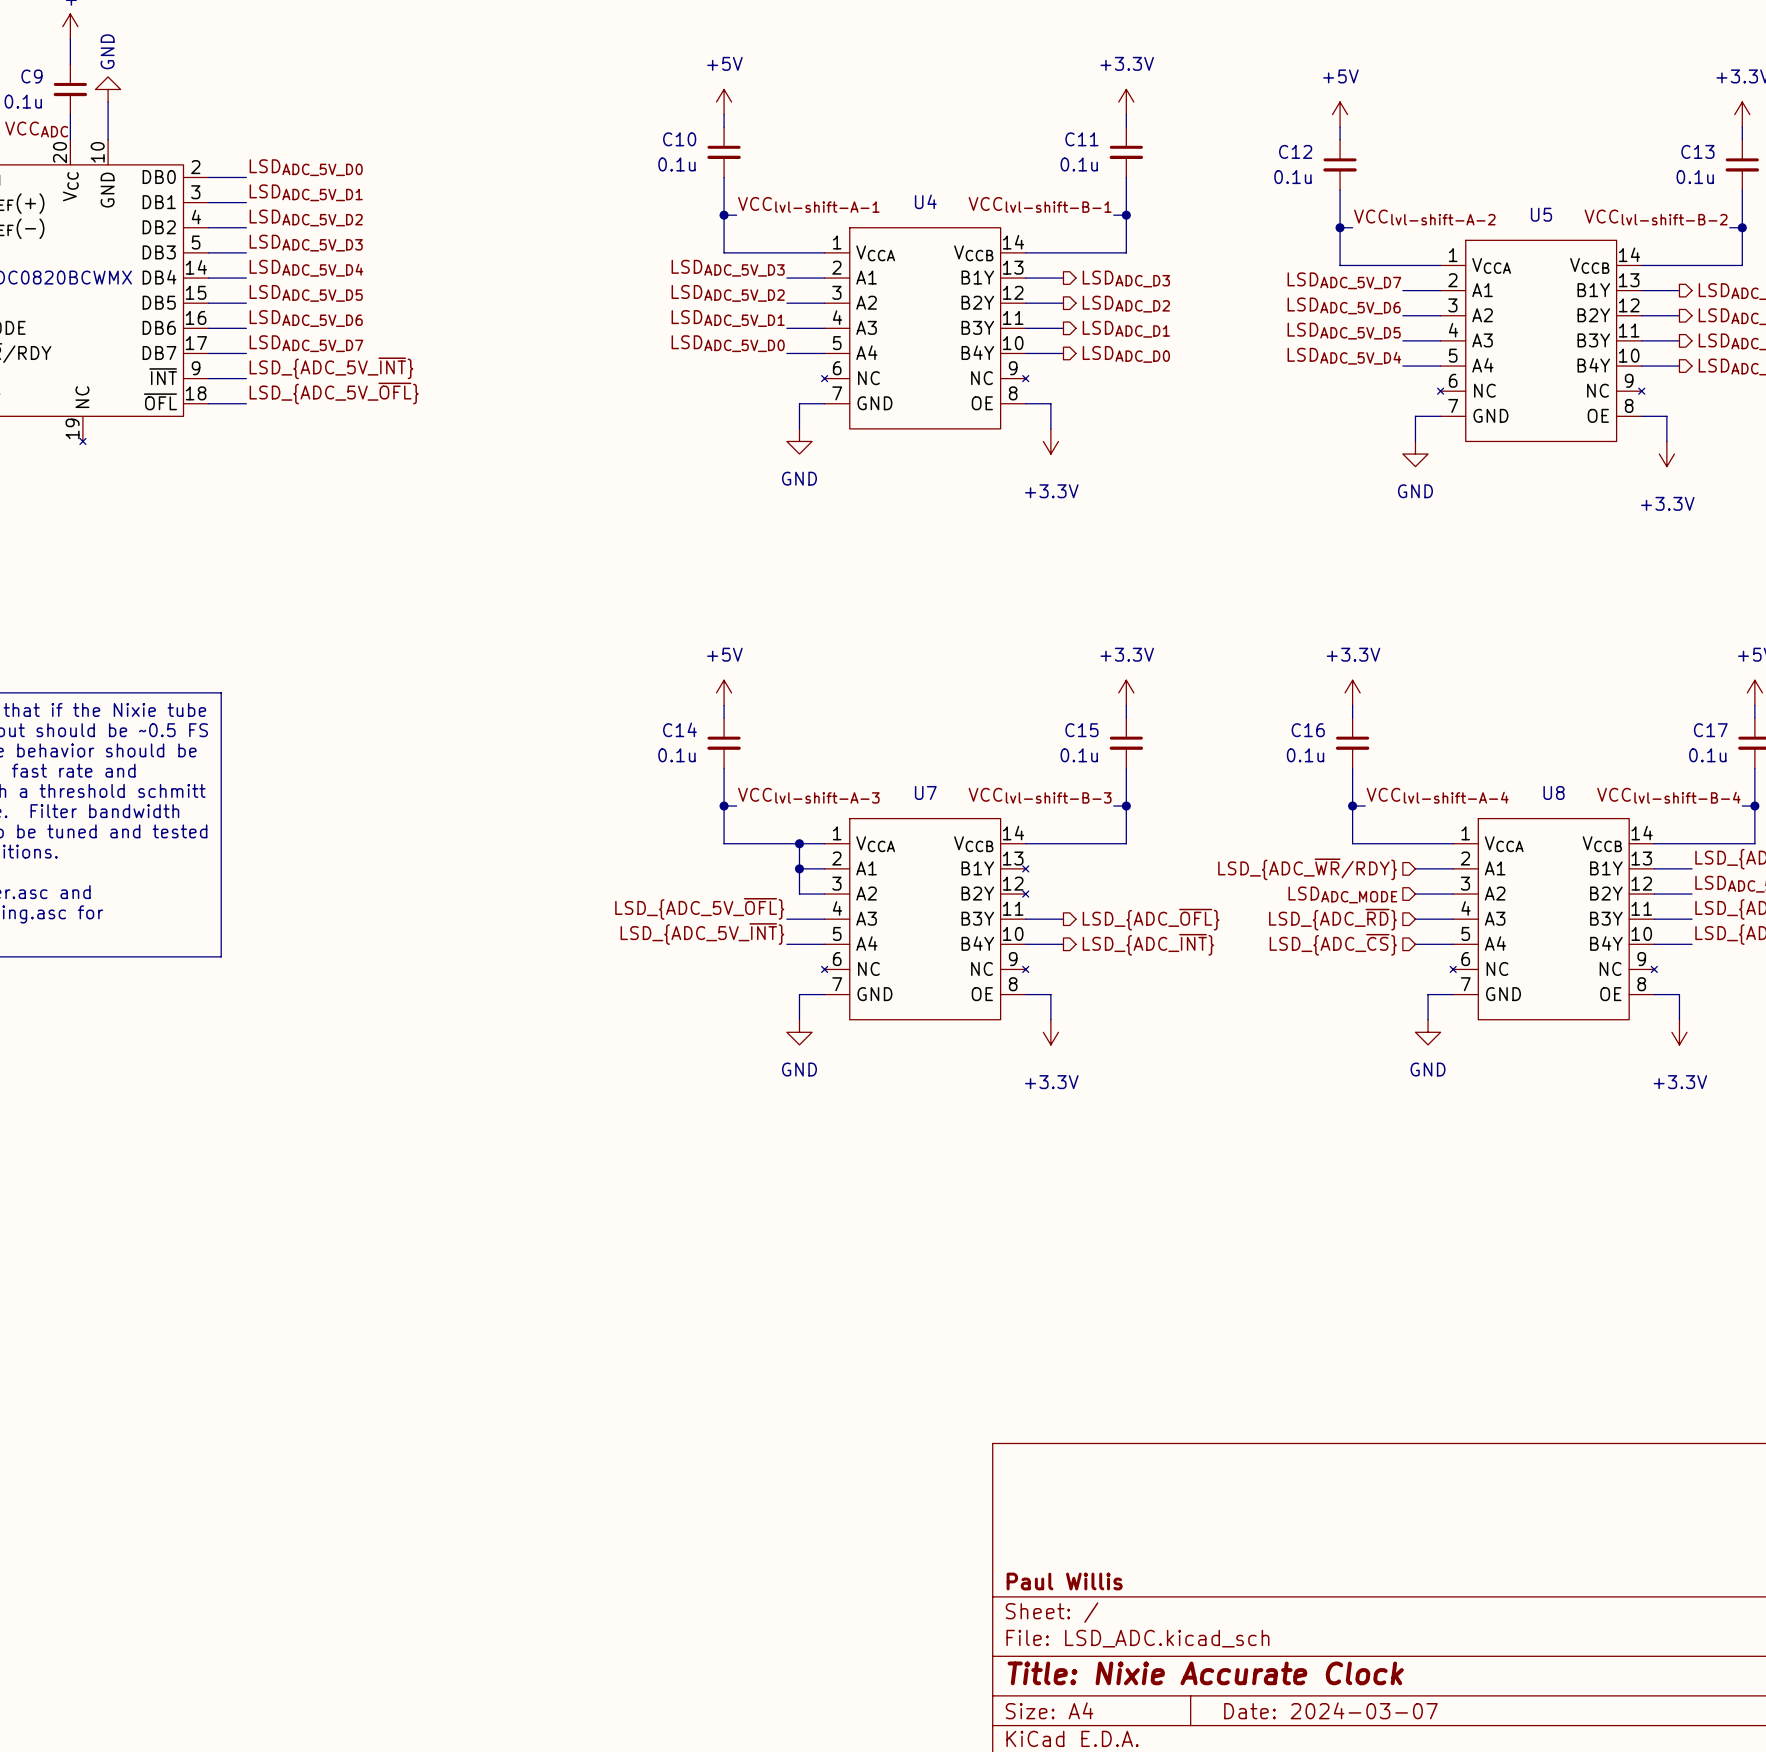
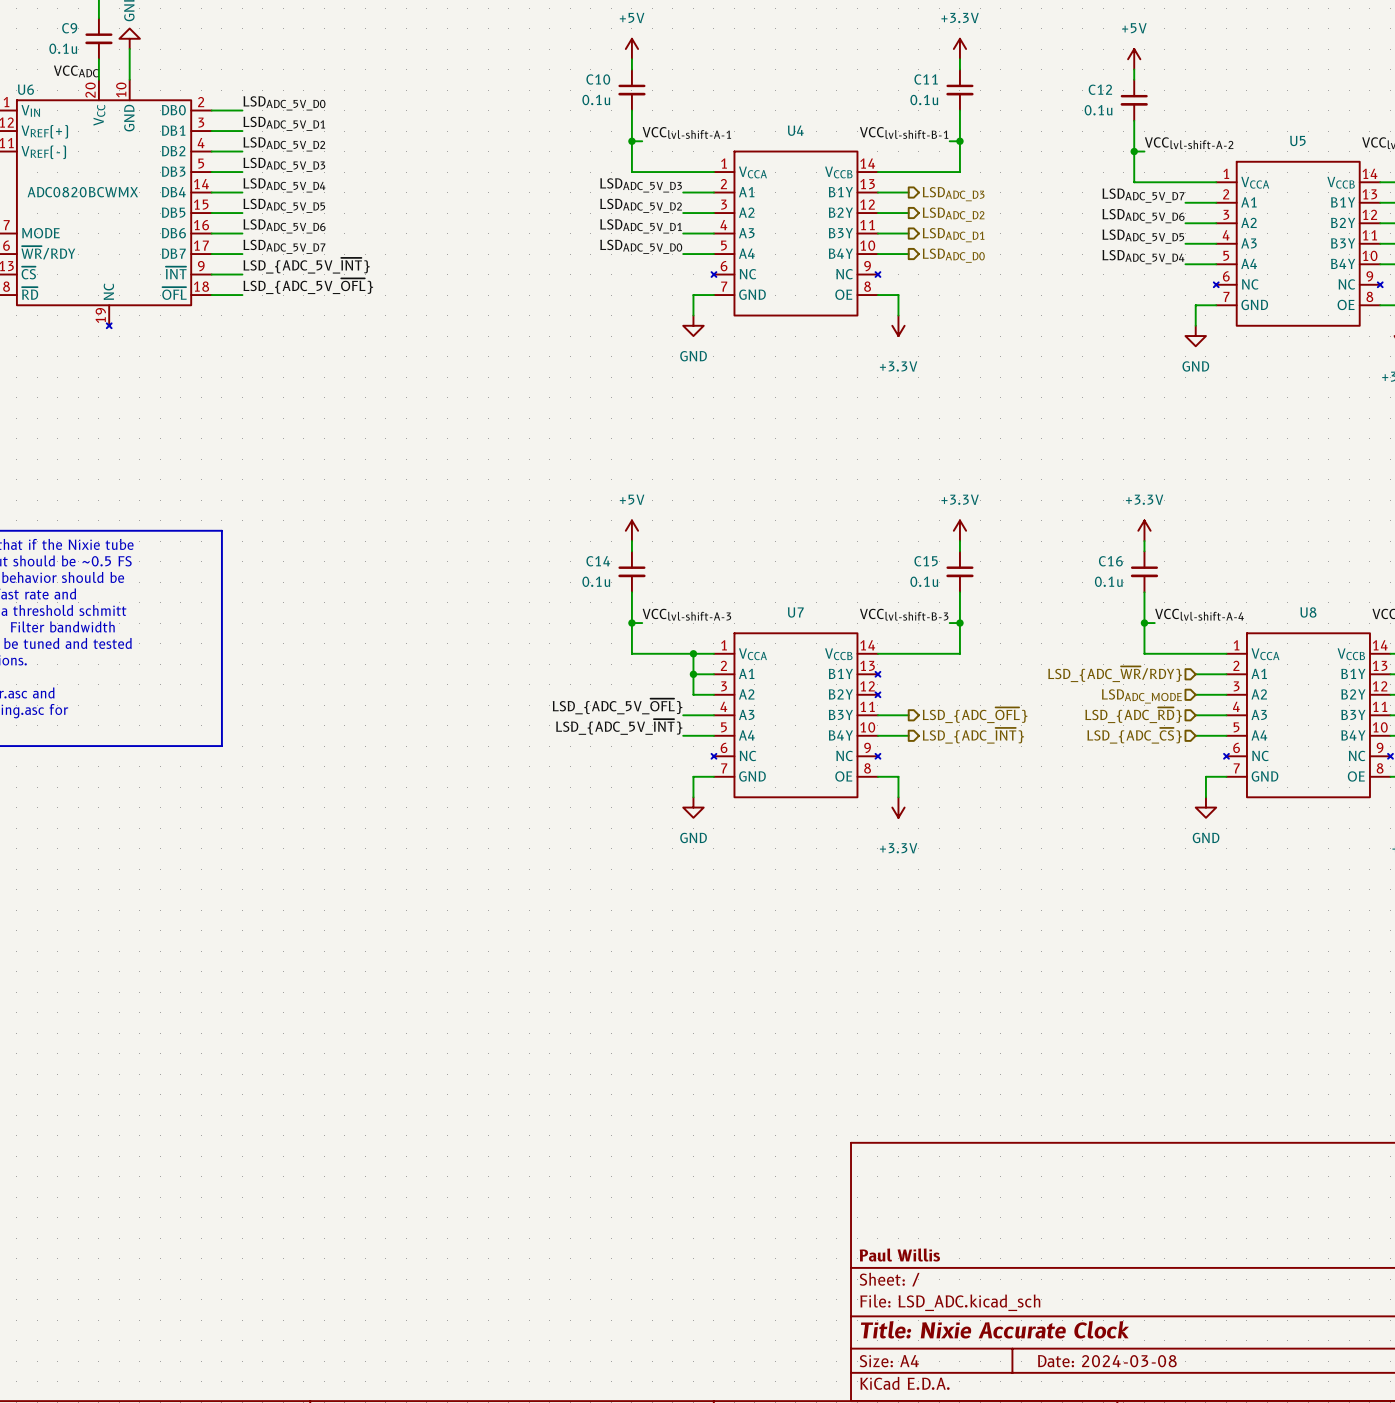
title block: Date: 2024-03-07 (1330, 1710) -> Date: 2024-03-08 (1107, 1361)

